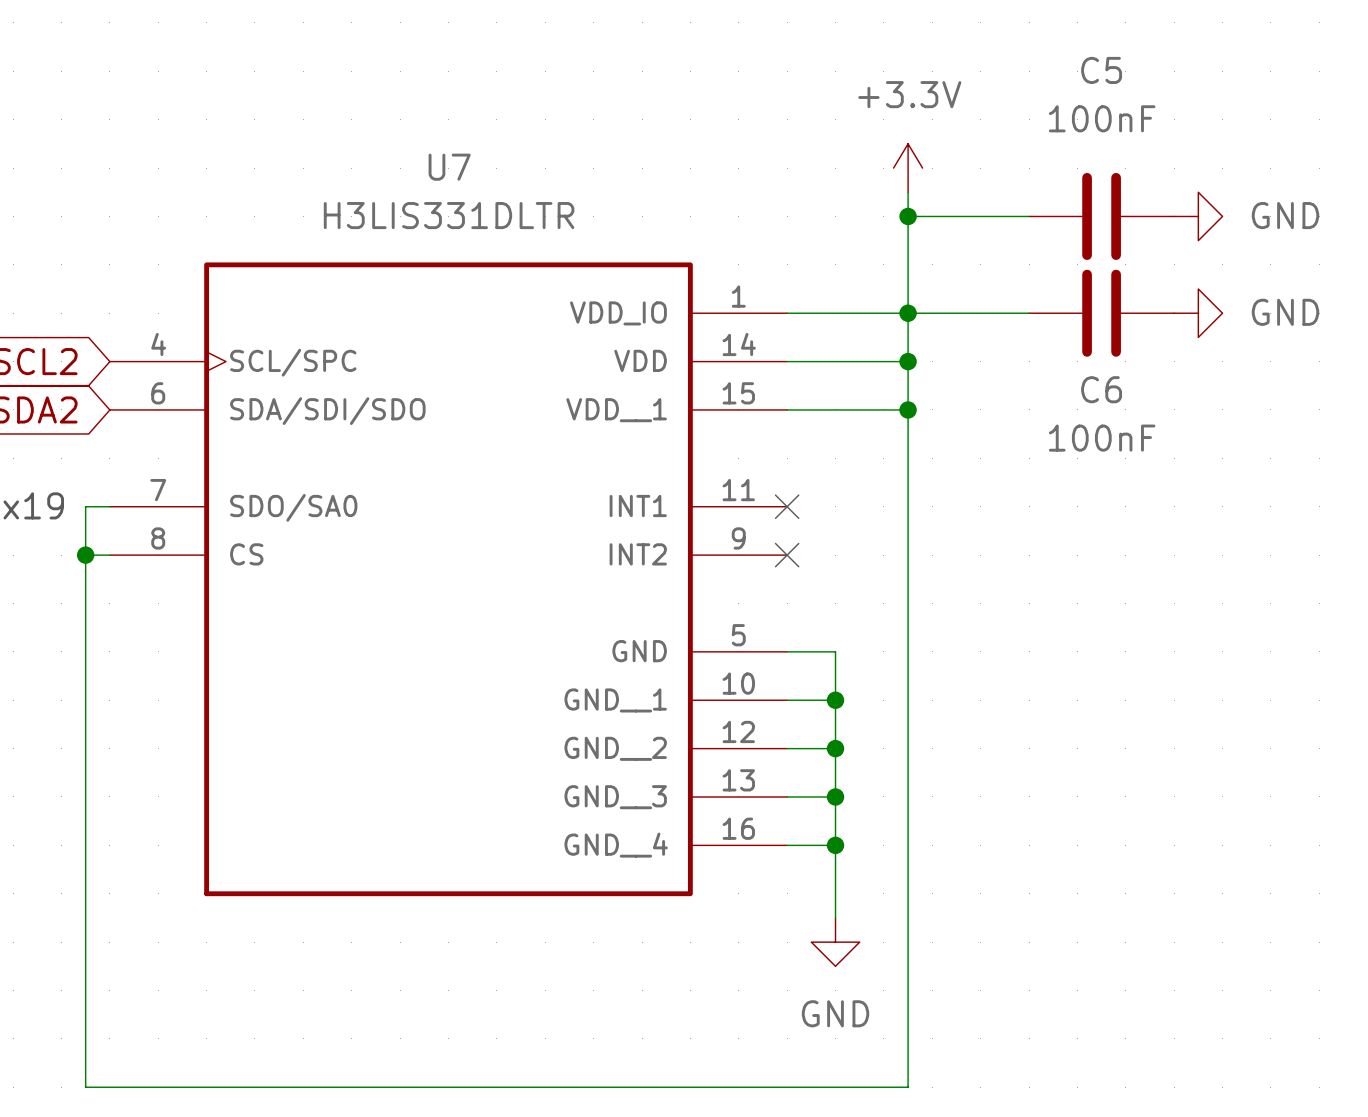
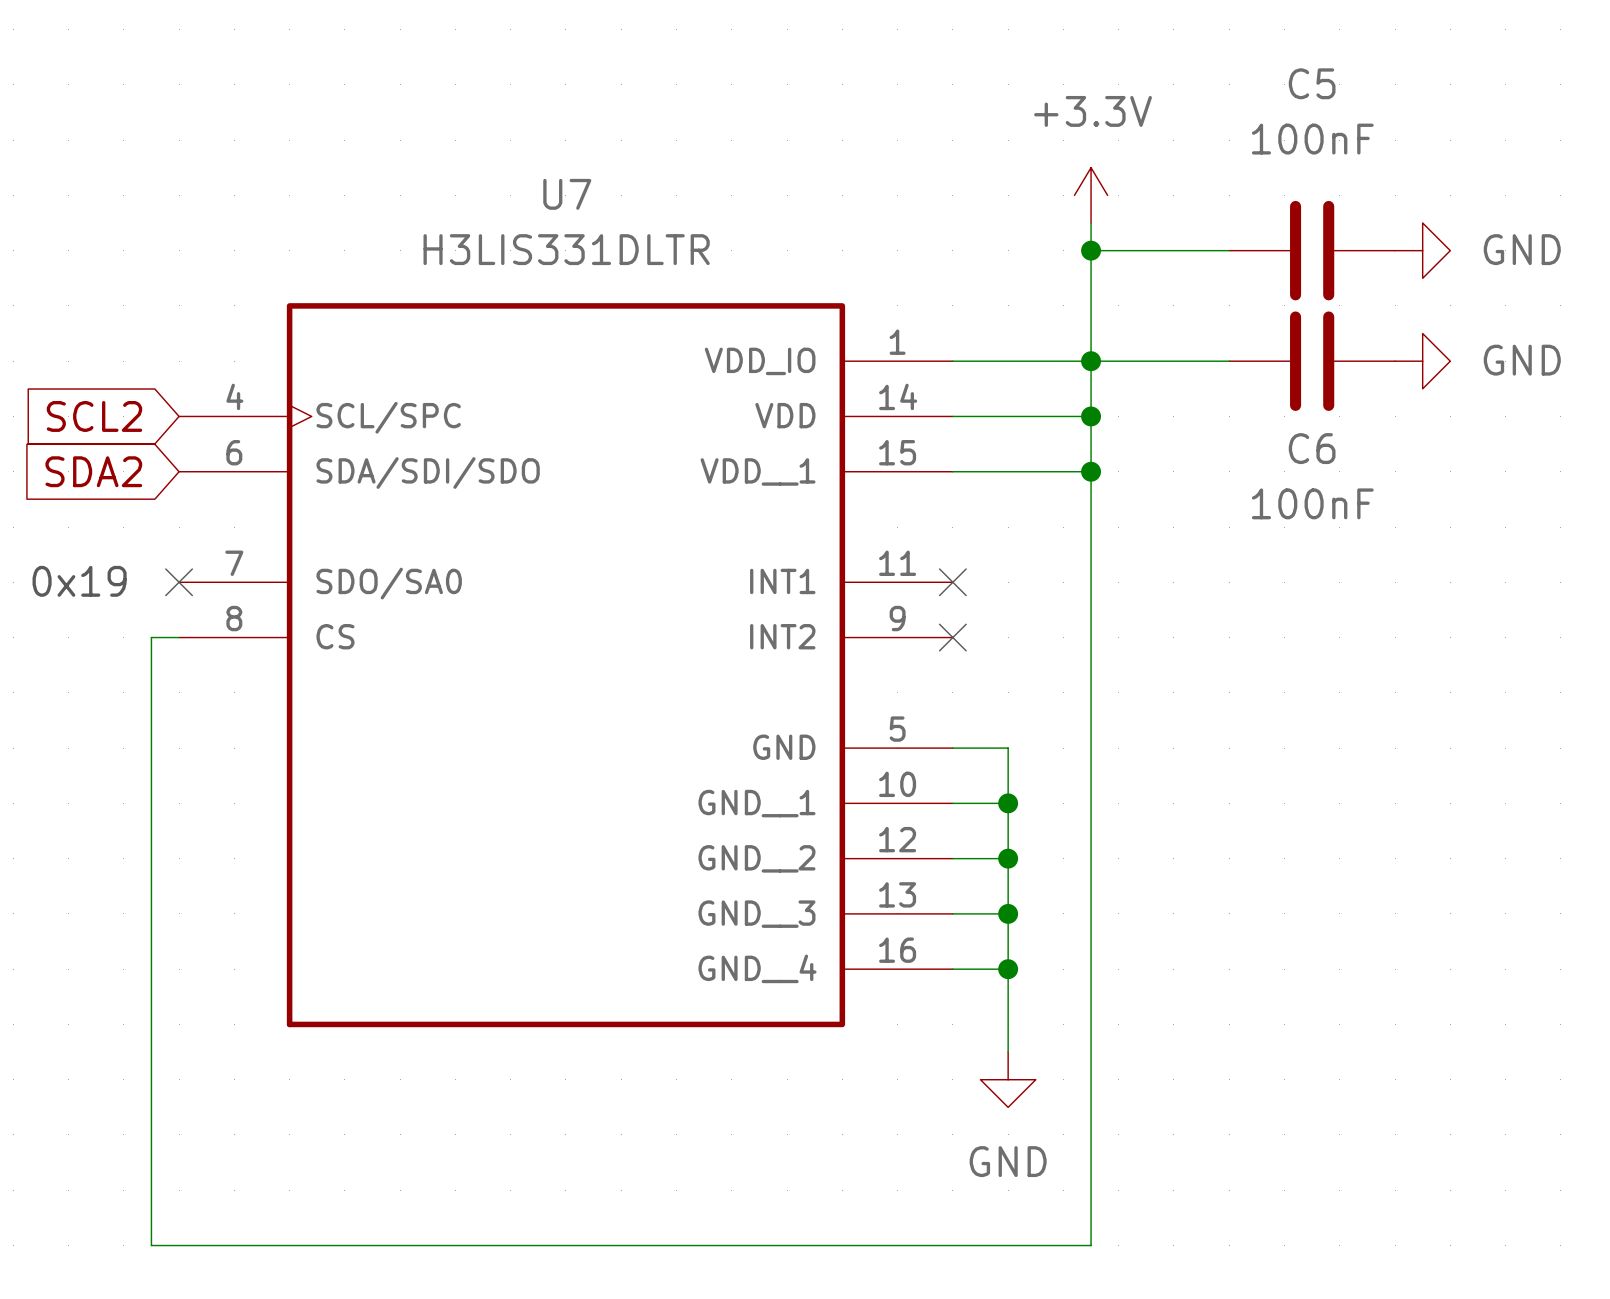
wire: (109, 506) (85, 506) (85, 555) -> none
no-connect mark: none -> (179, 582)
junction: (85, 555) -> none

